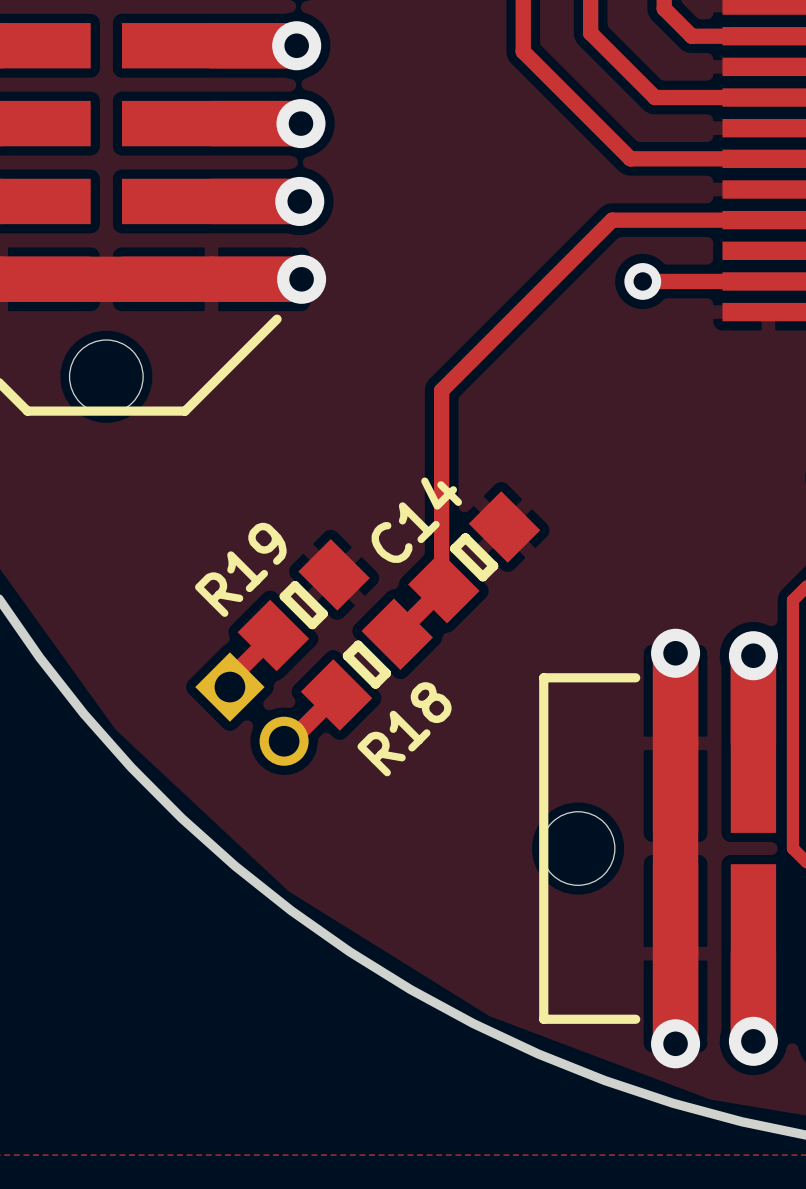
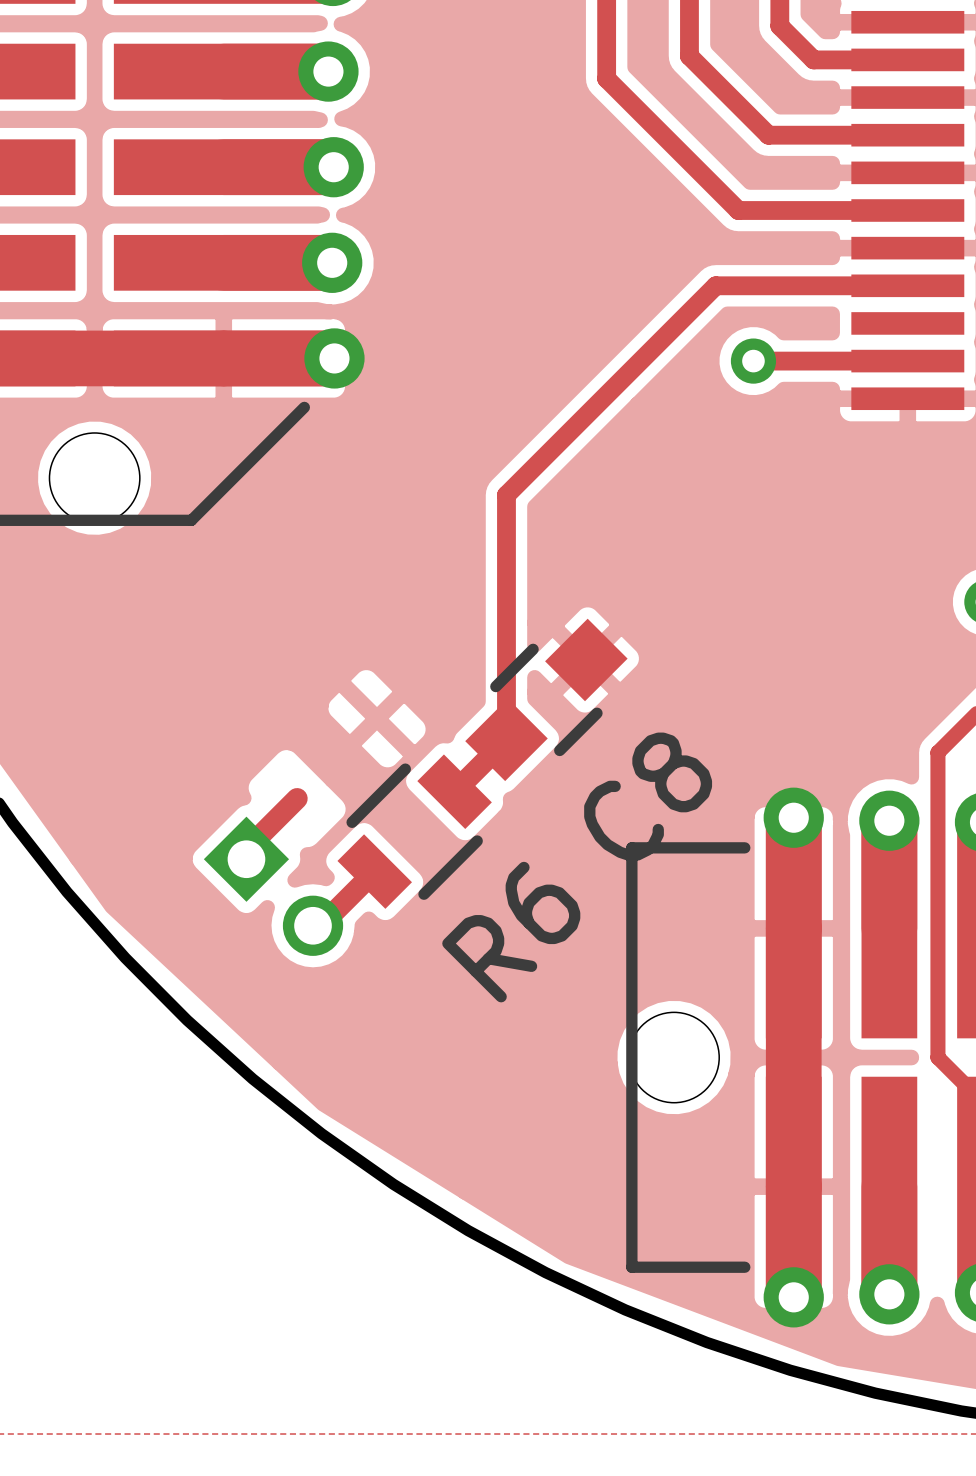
text: C14 (416, 520) -> none
part: (474, 557) -> none
C8: none -> (546, 699)
text: R19 (240, 569) -> none
part: (303, 605) -> none
part: (366, 664) -> none
R6: none -> (414, 831)
text: R18 (404, 729) -> none

